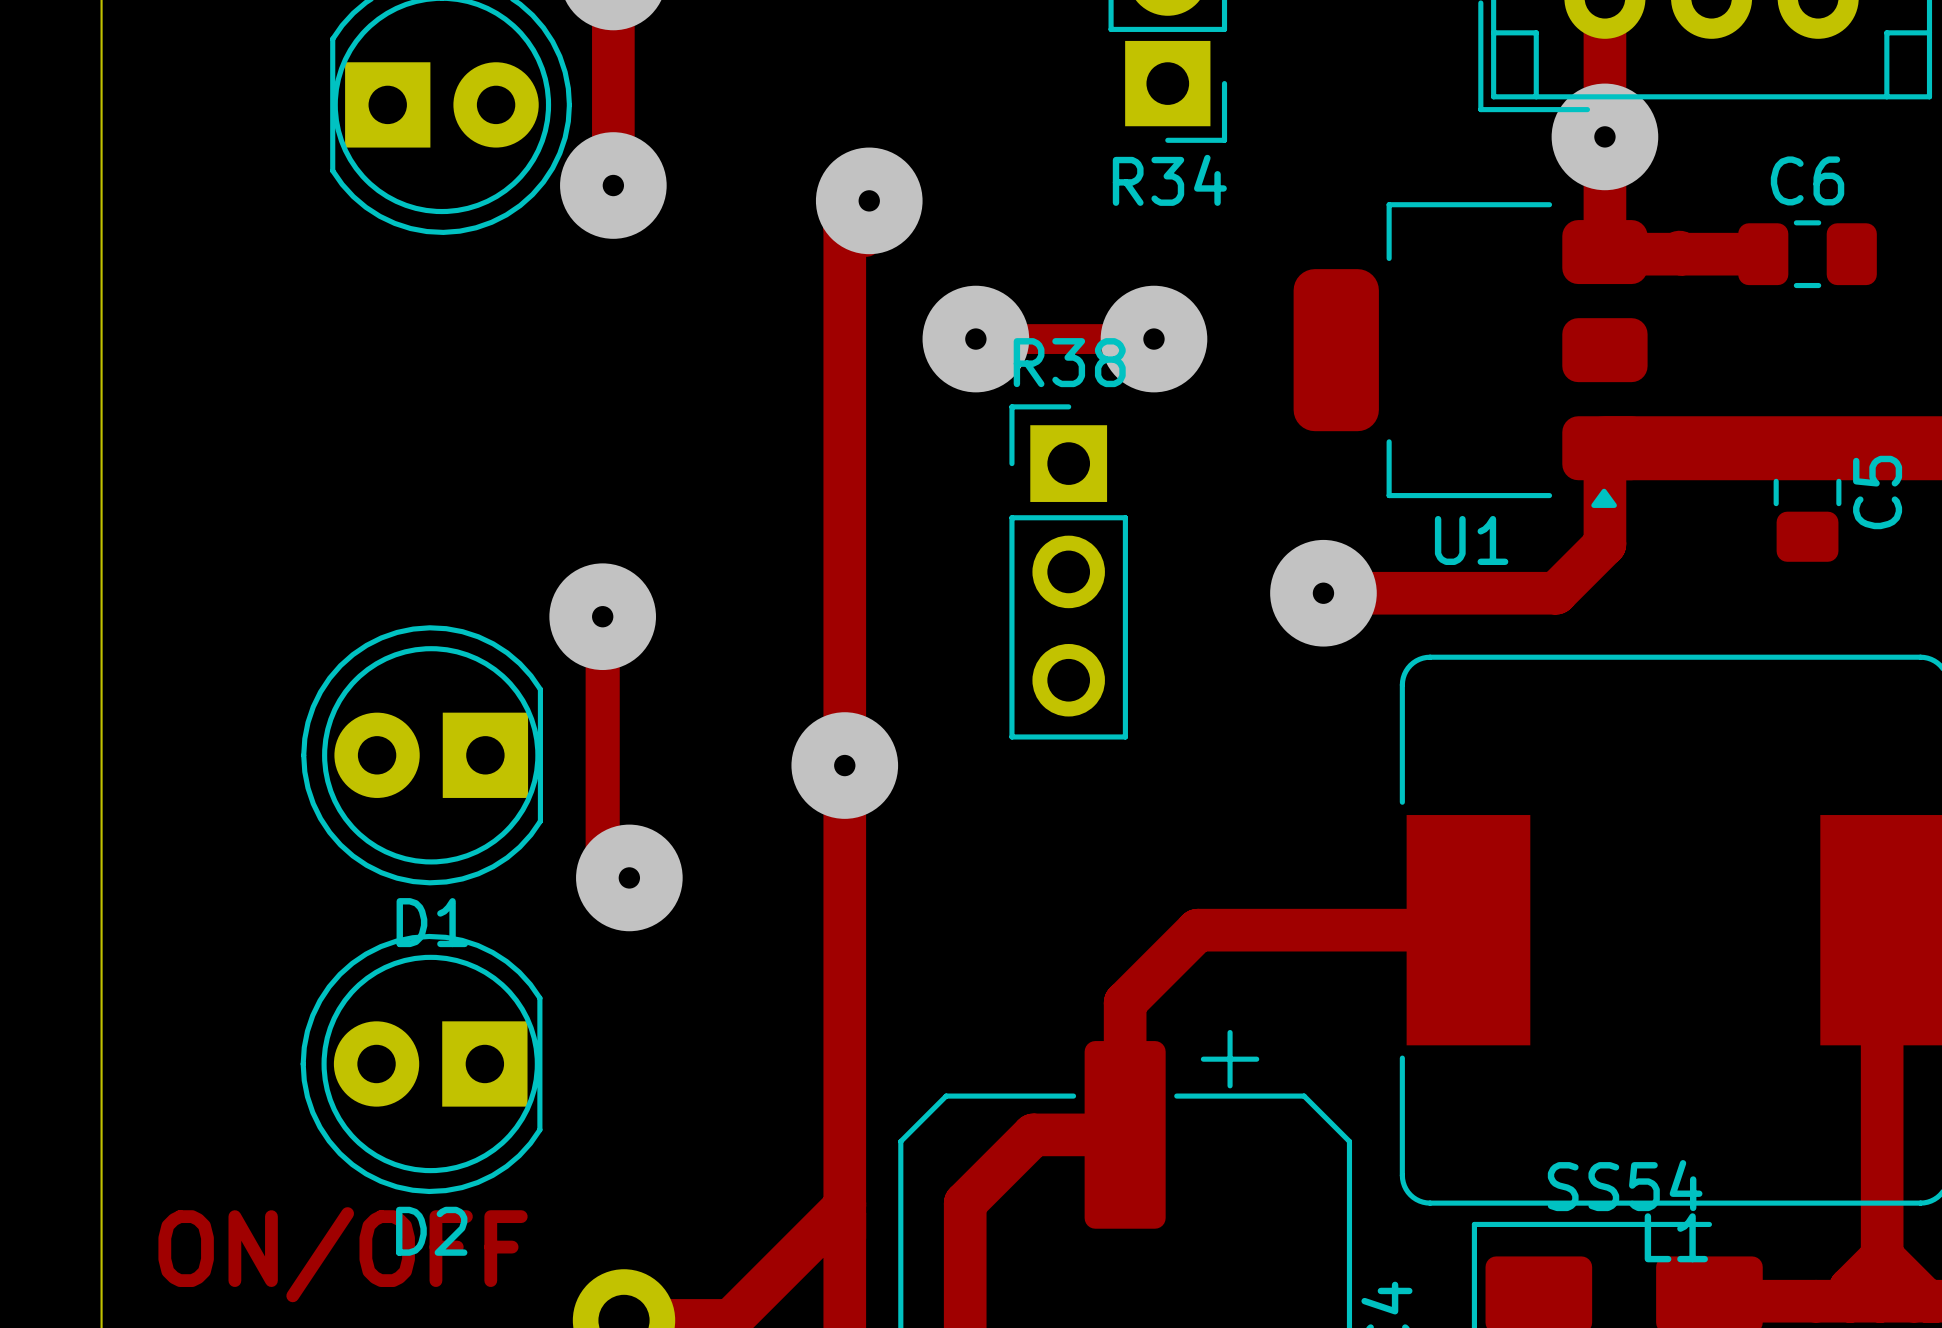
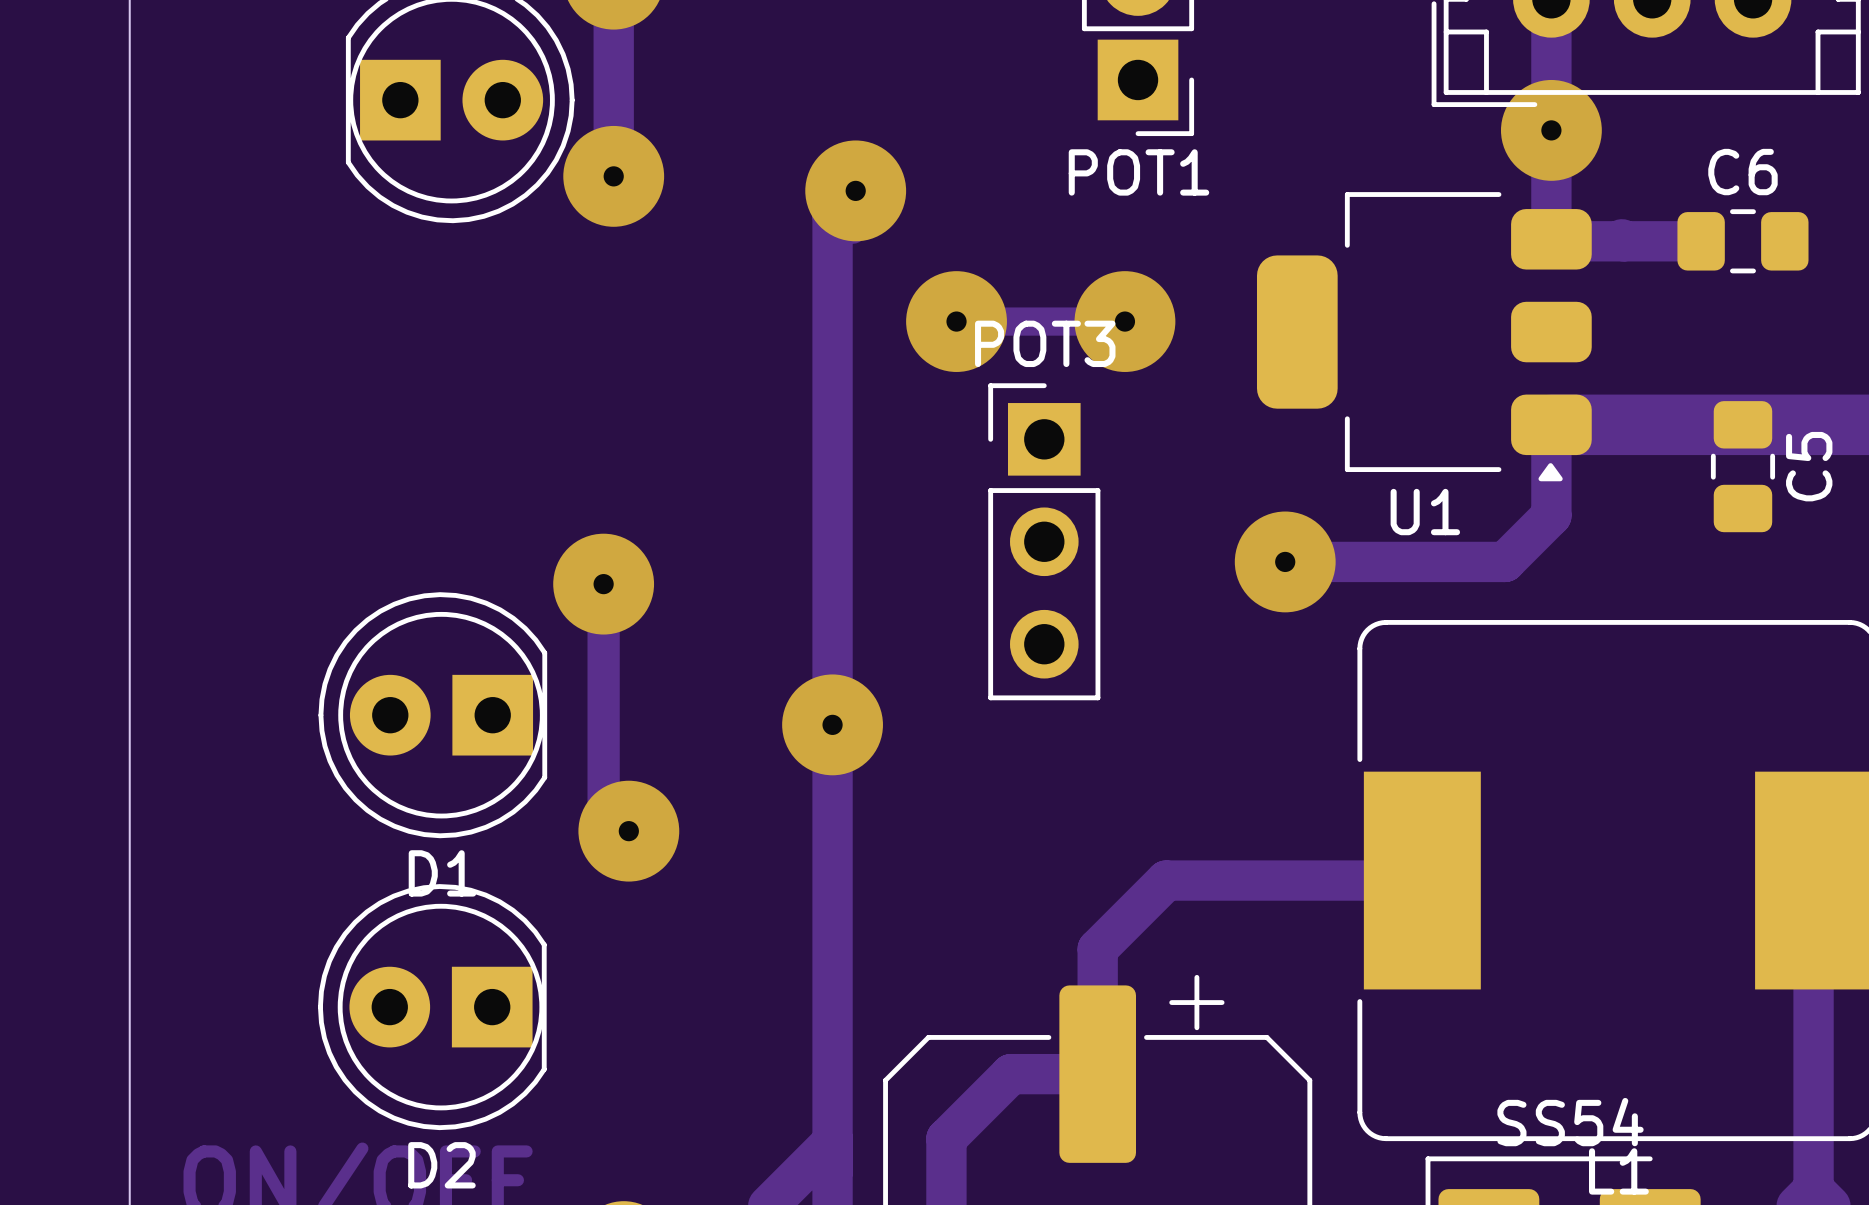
R34 name: R34 (1169, 180) -> POT1 (1138, 172)
R38 name: R38 (1069, 362) -> POT3 (1045, 343)

